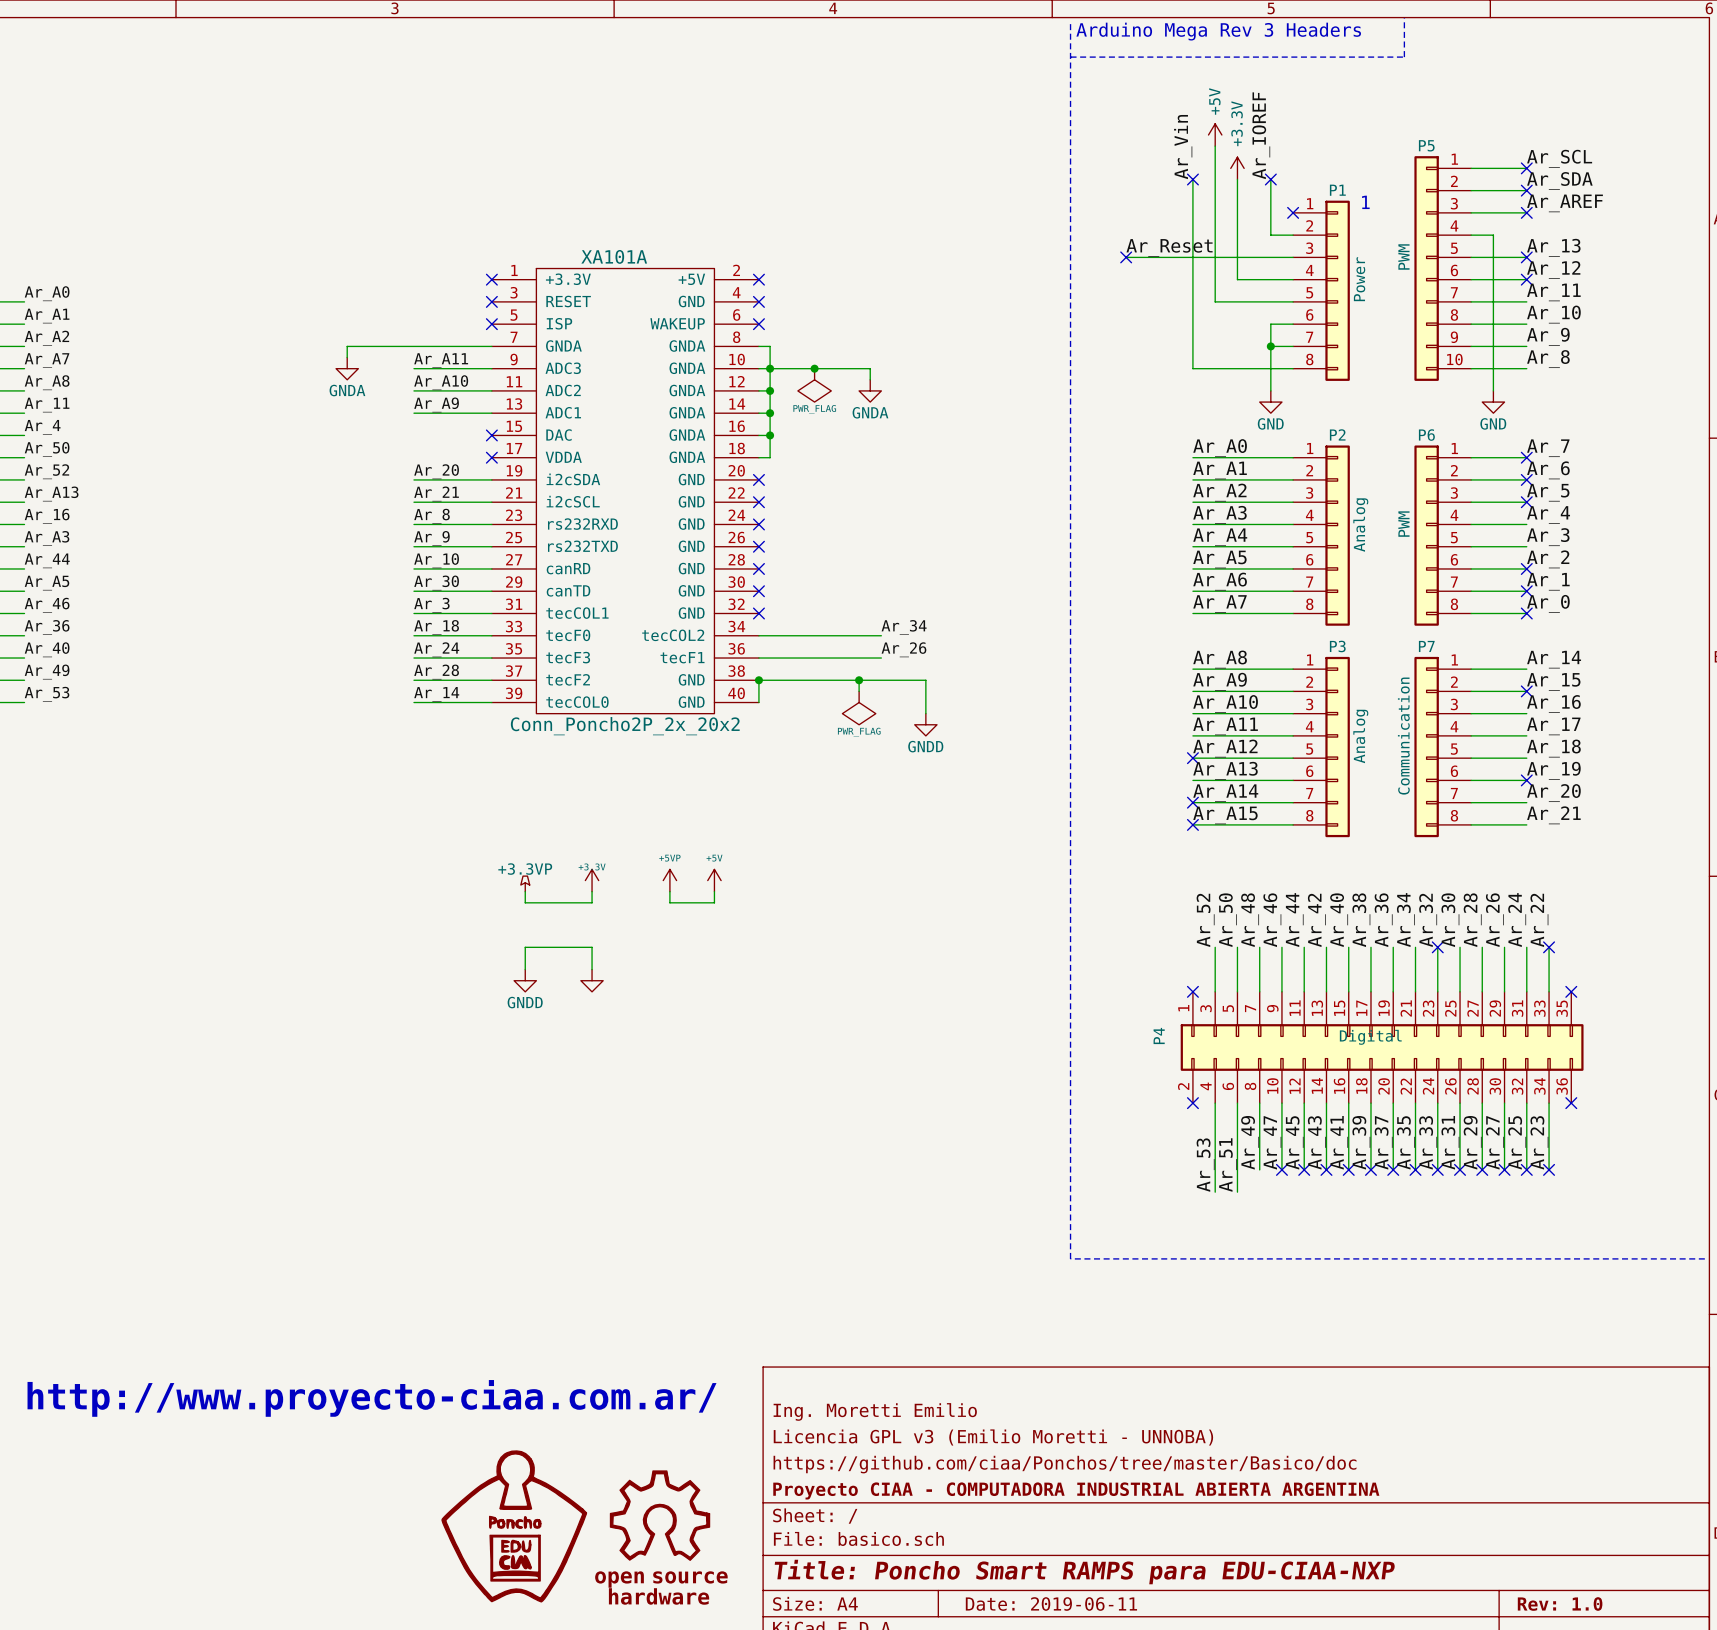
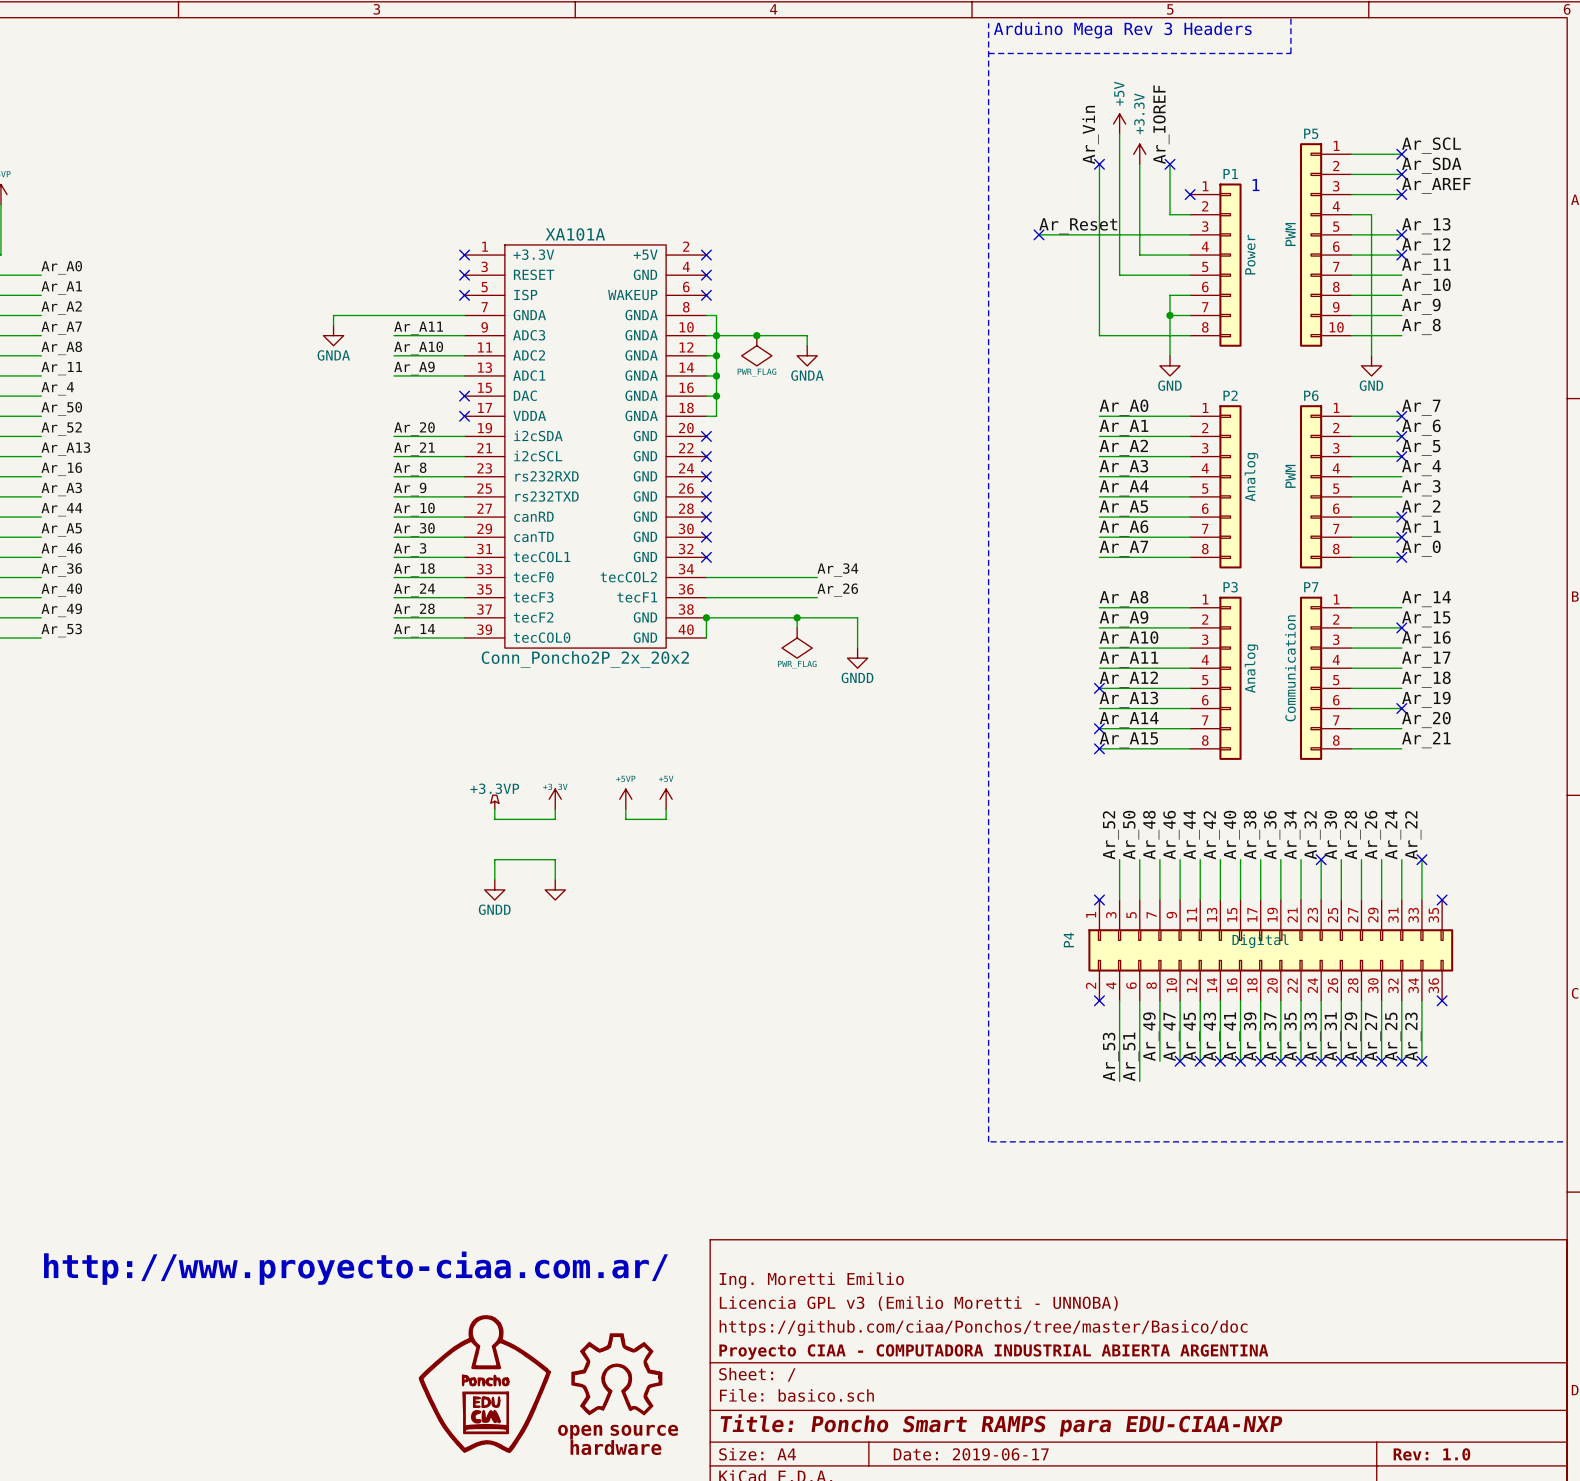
title block: Date: 2019-06-11 (1051, 1604) -> Date: 2019-06-17 (971, 1454)

